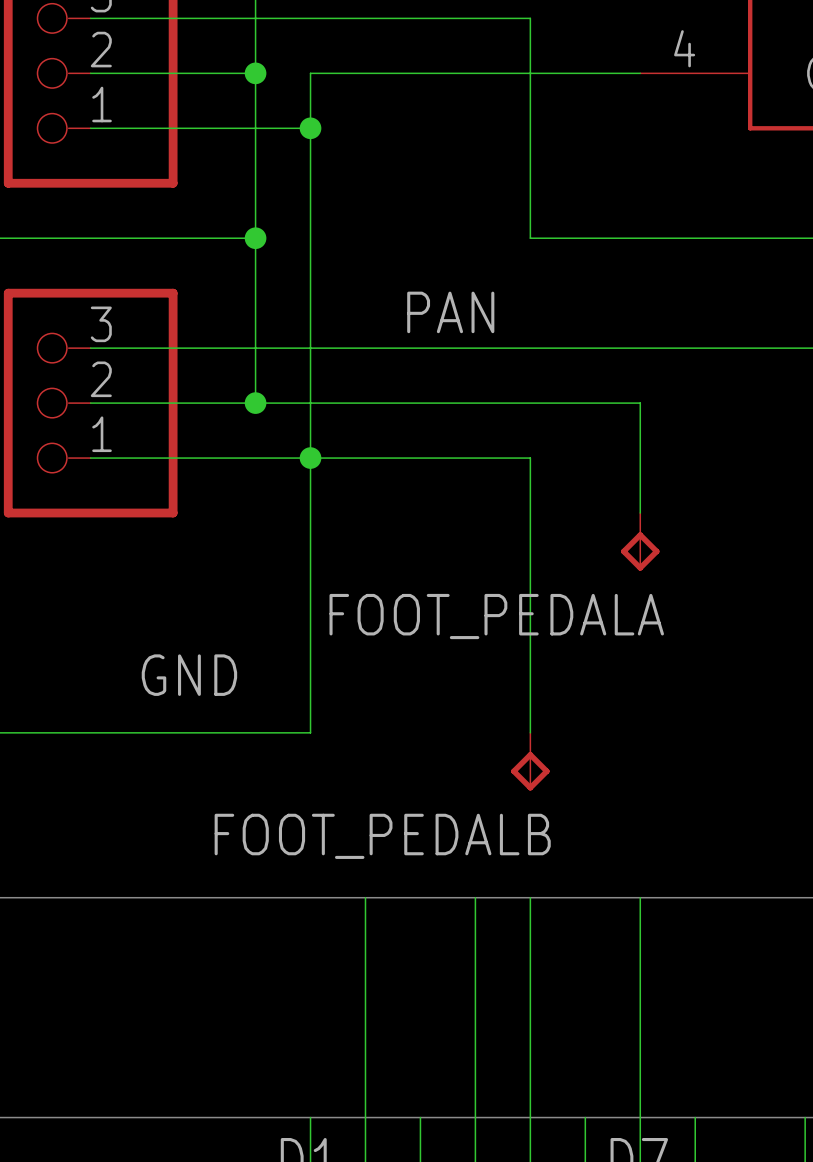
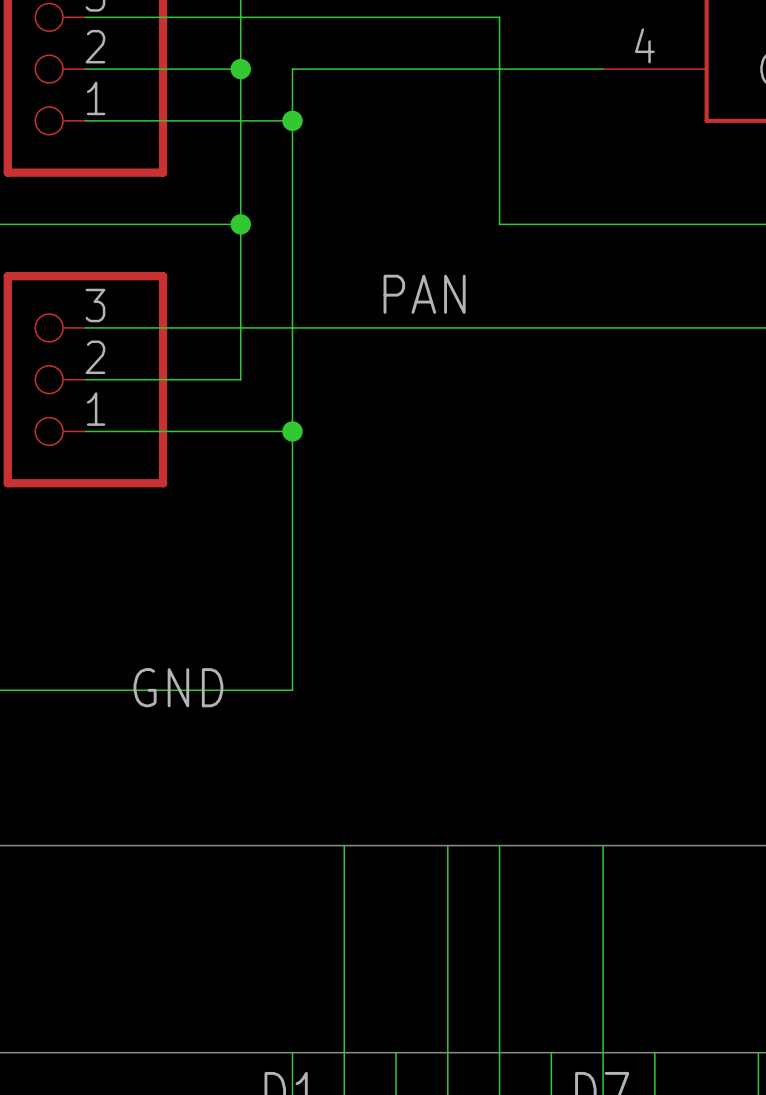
wire: (255, 403) (640, 403) (640, 513) -> none
junction: (255, 403) -> none
wire: (310, 458) (530, 458) (530, 732) -> none
FOOT_PEDALA: (640, 541) -> none
label position: GND (189, 675) -> GND (178, 687)
FOOT_PEDALB: (530, 761) -> none

